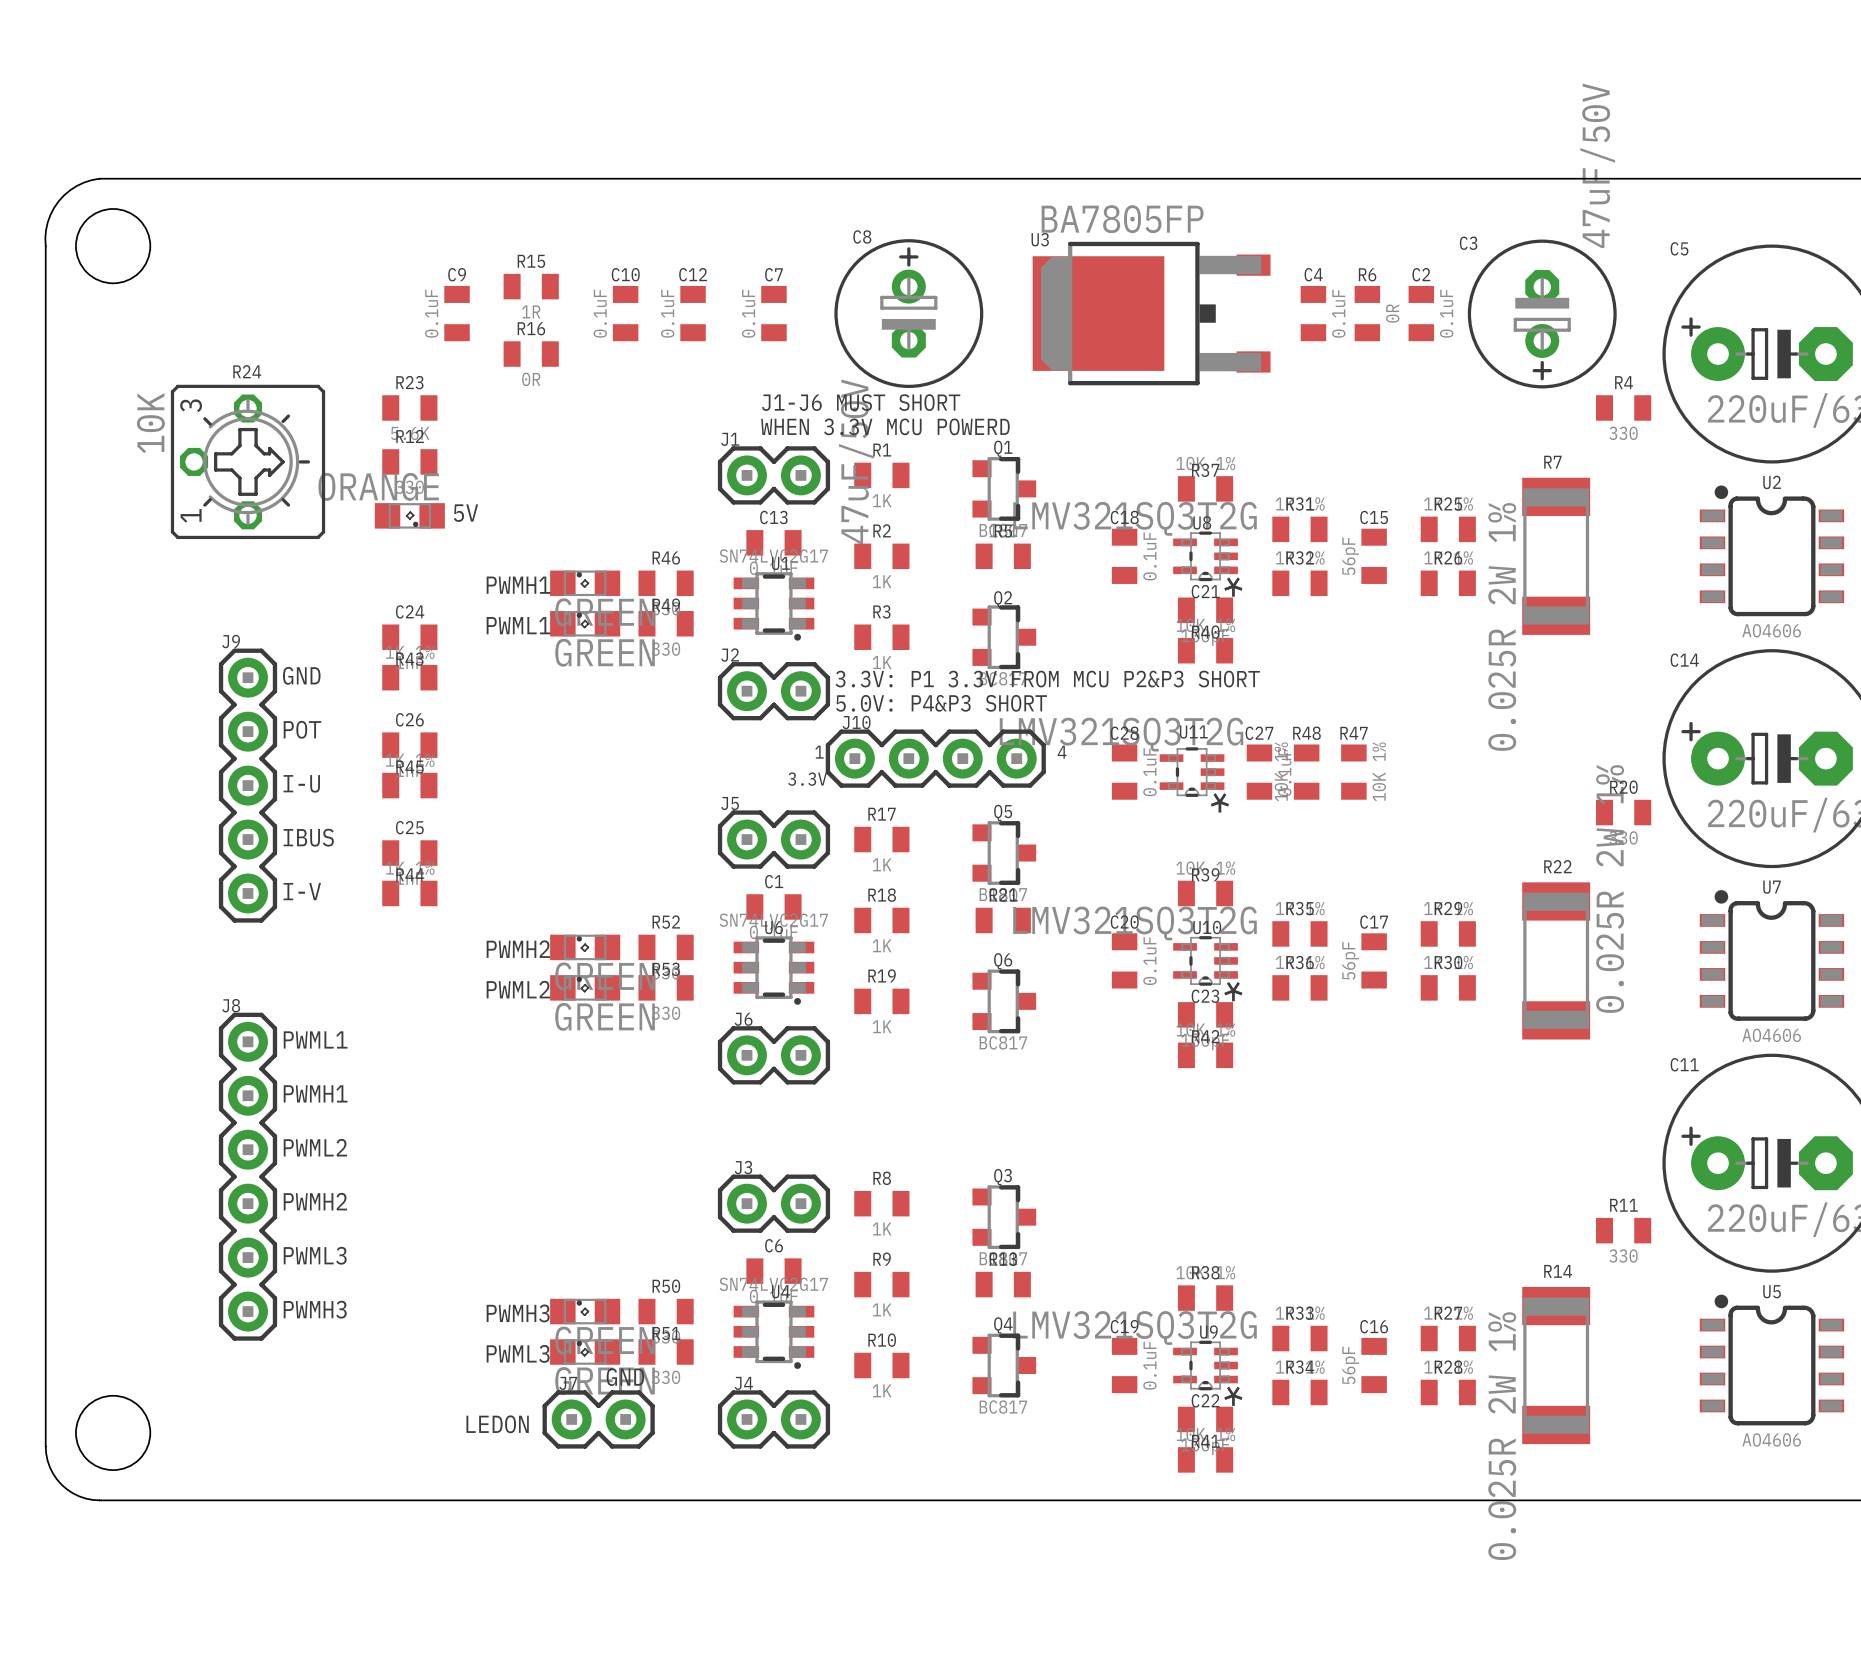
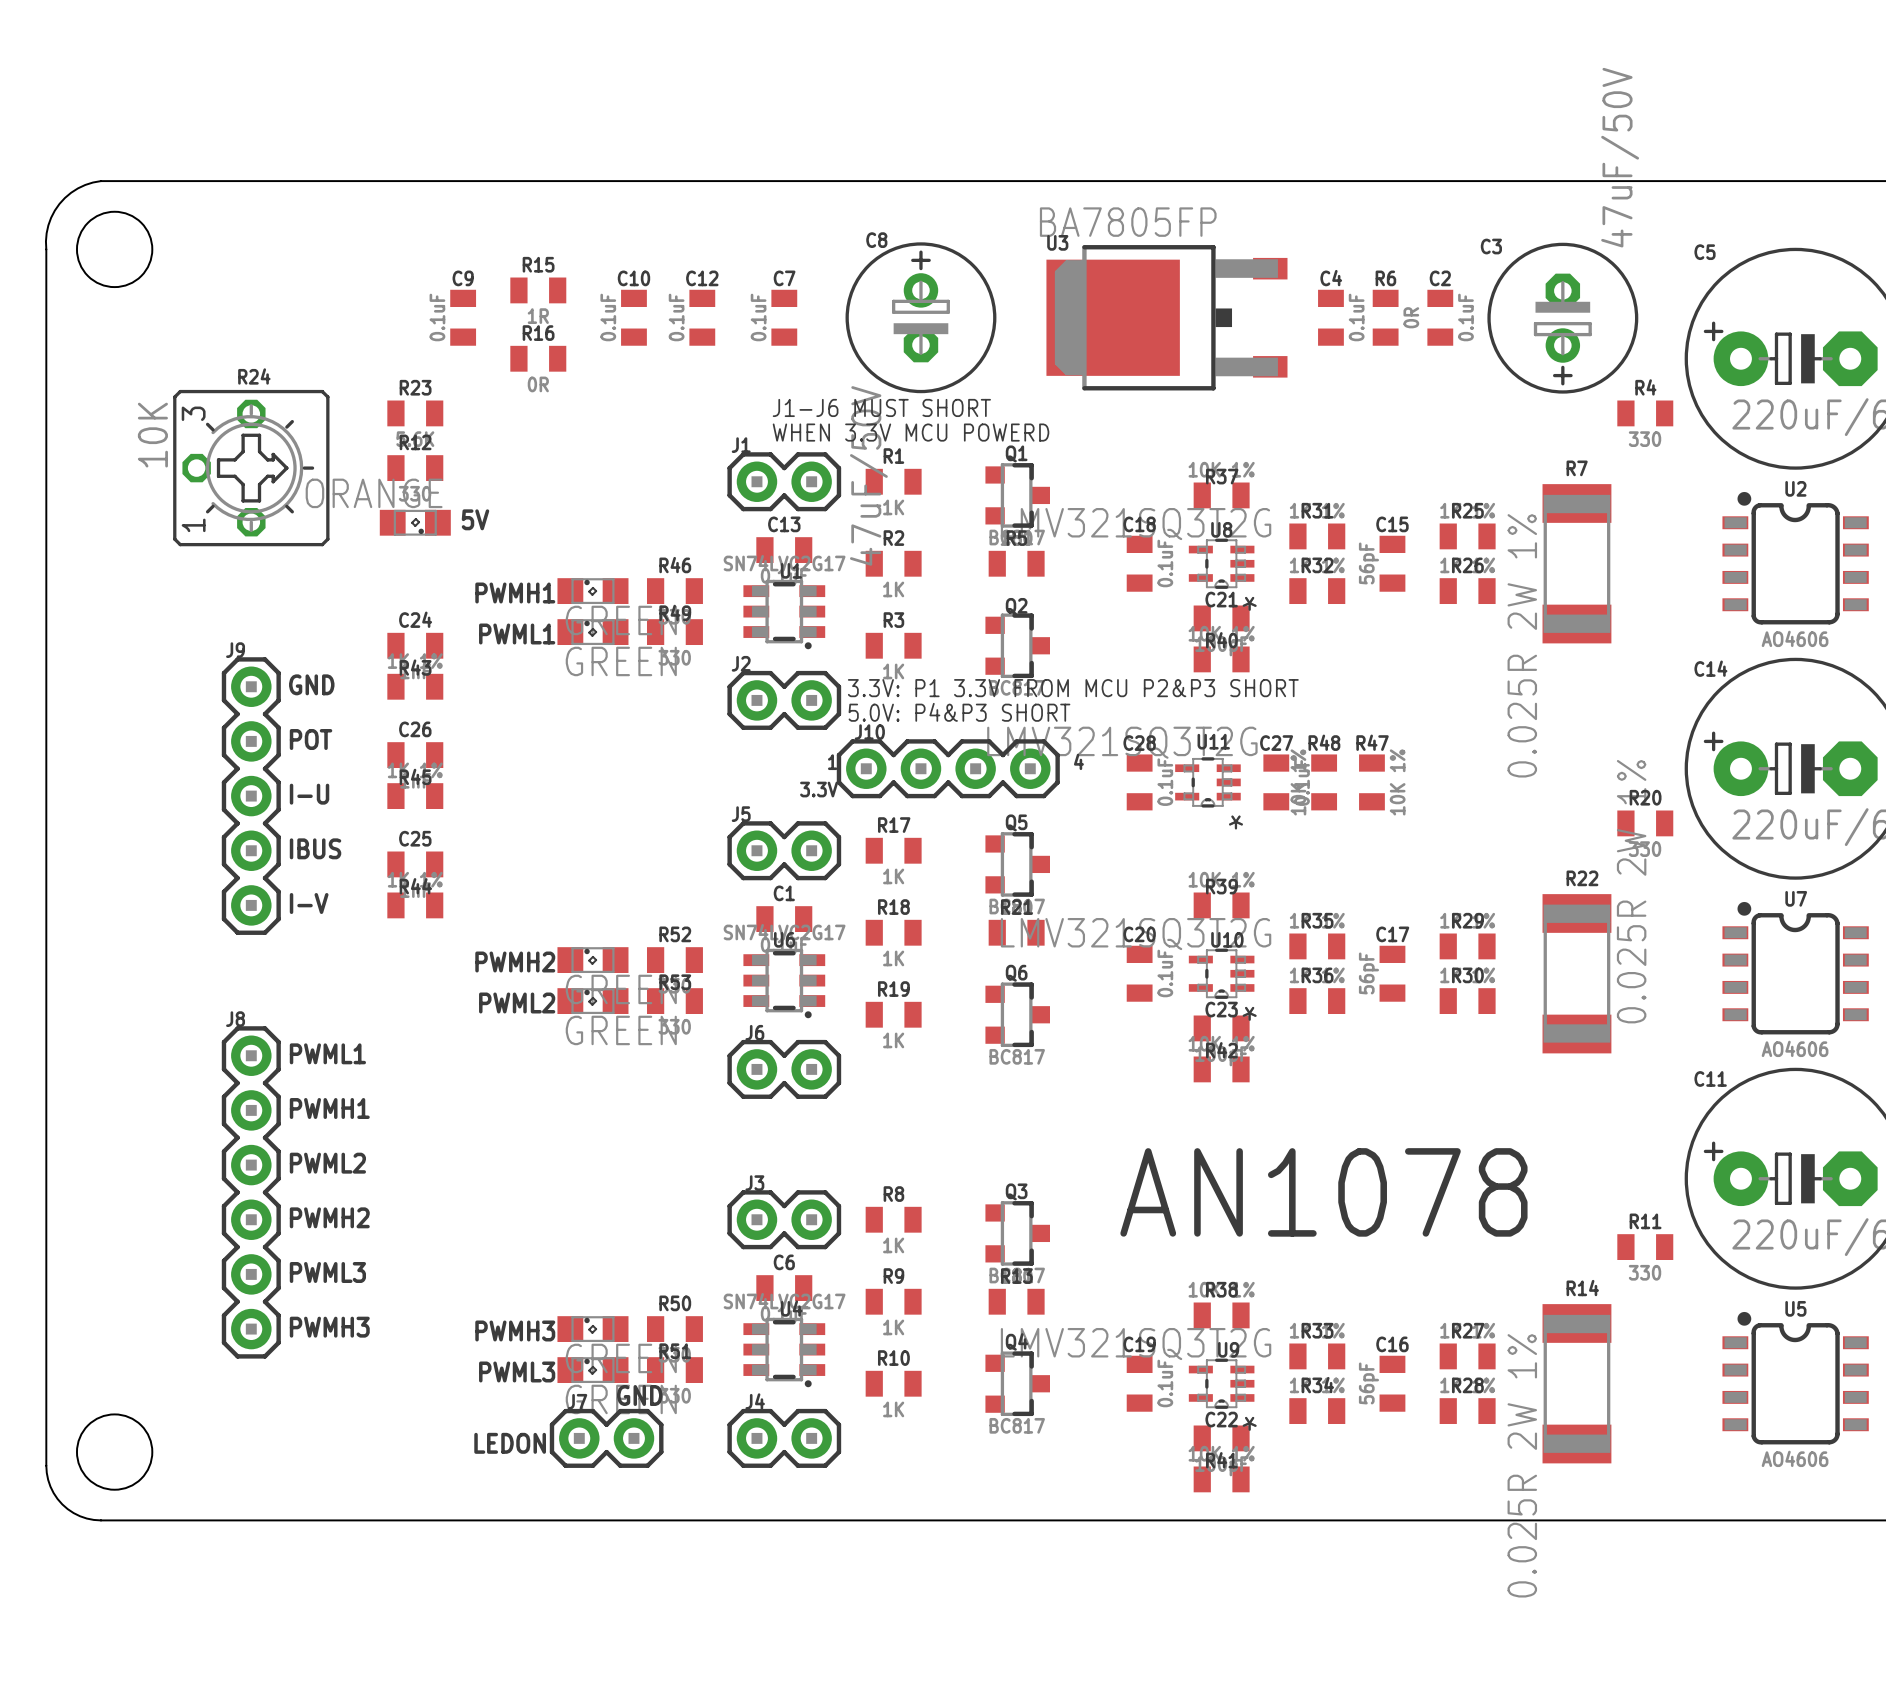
text: none -> AN1078 (1323, 1192)

